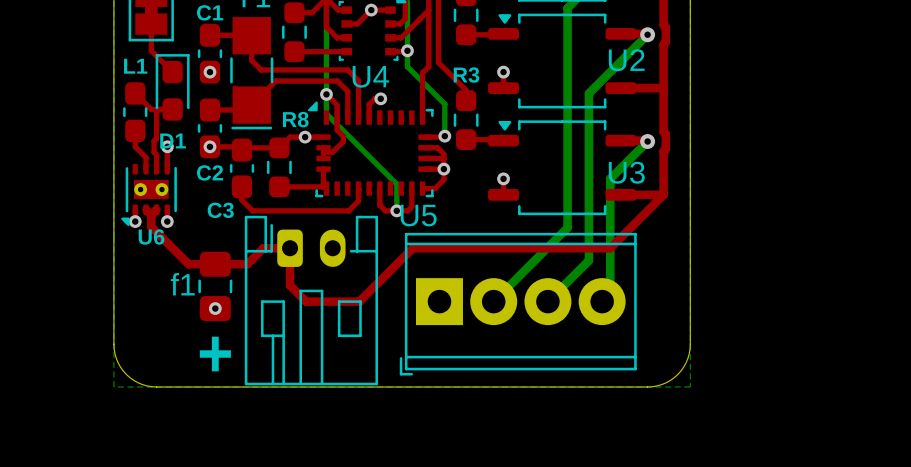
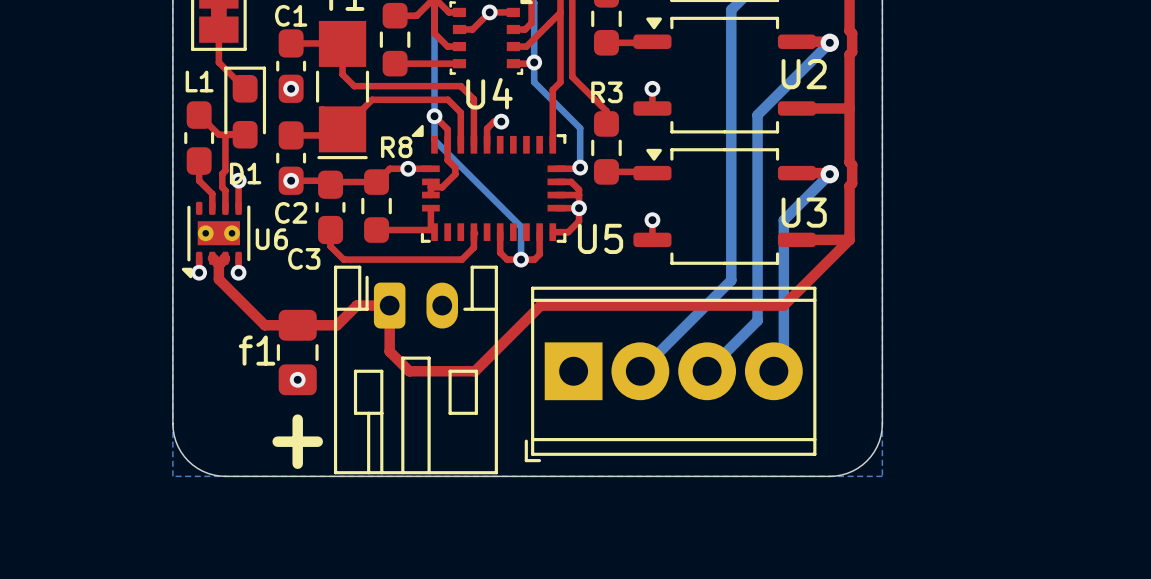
U5 name position: U5 (418, 215) -> U5 (600, 238)
U6 name position: U6 (151, 237) -> U6 (271, 239)

